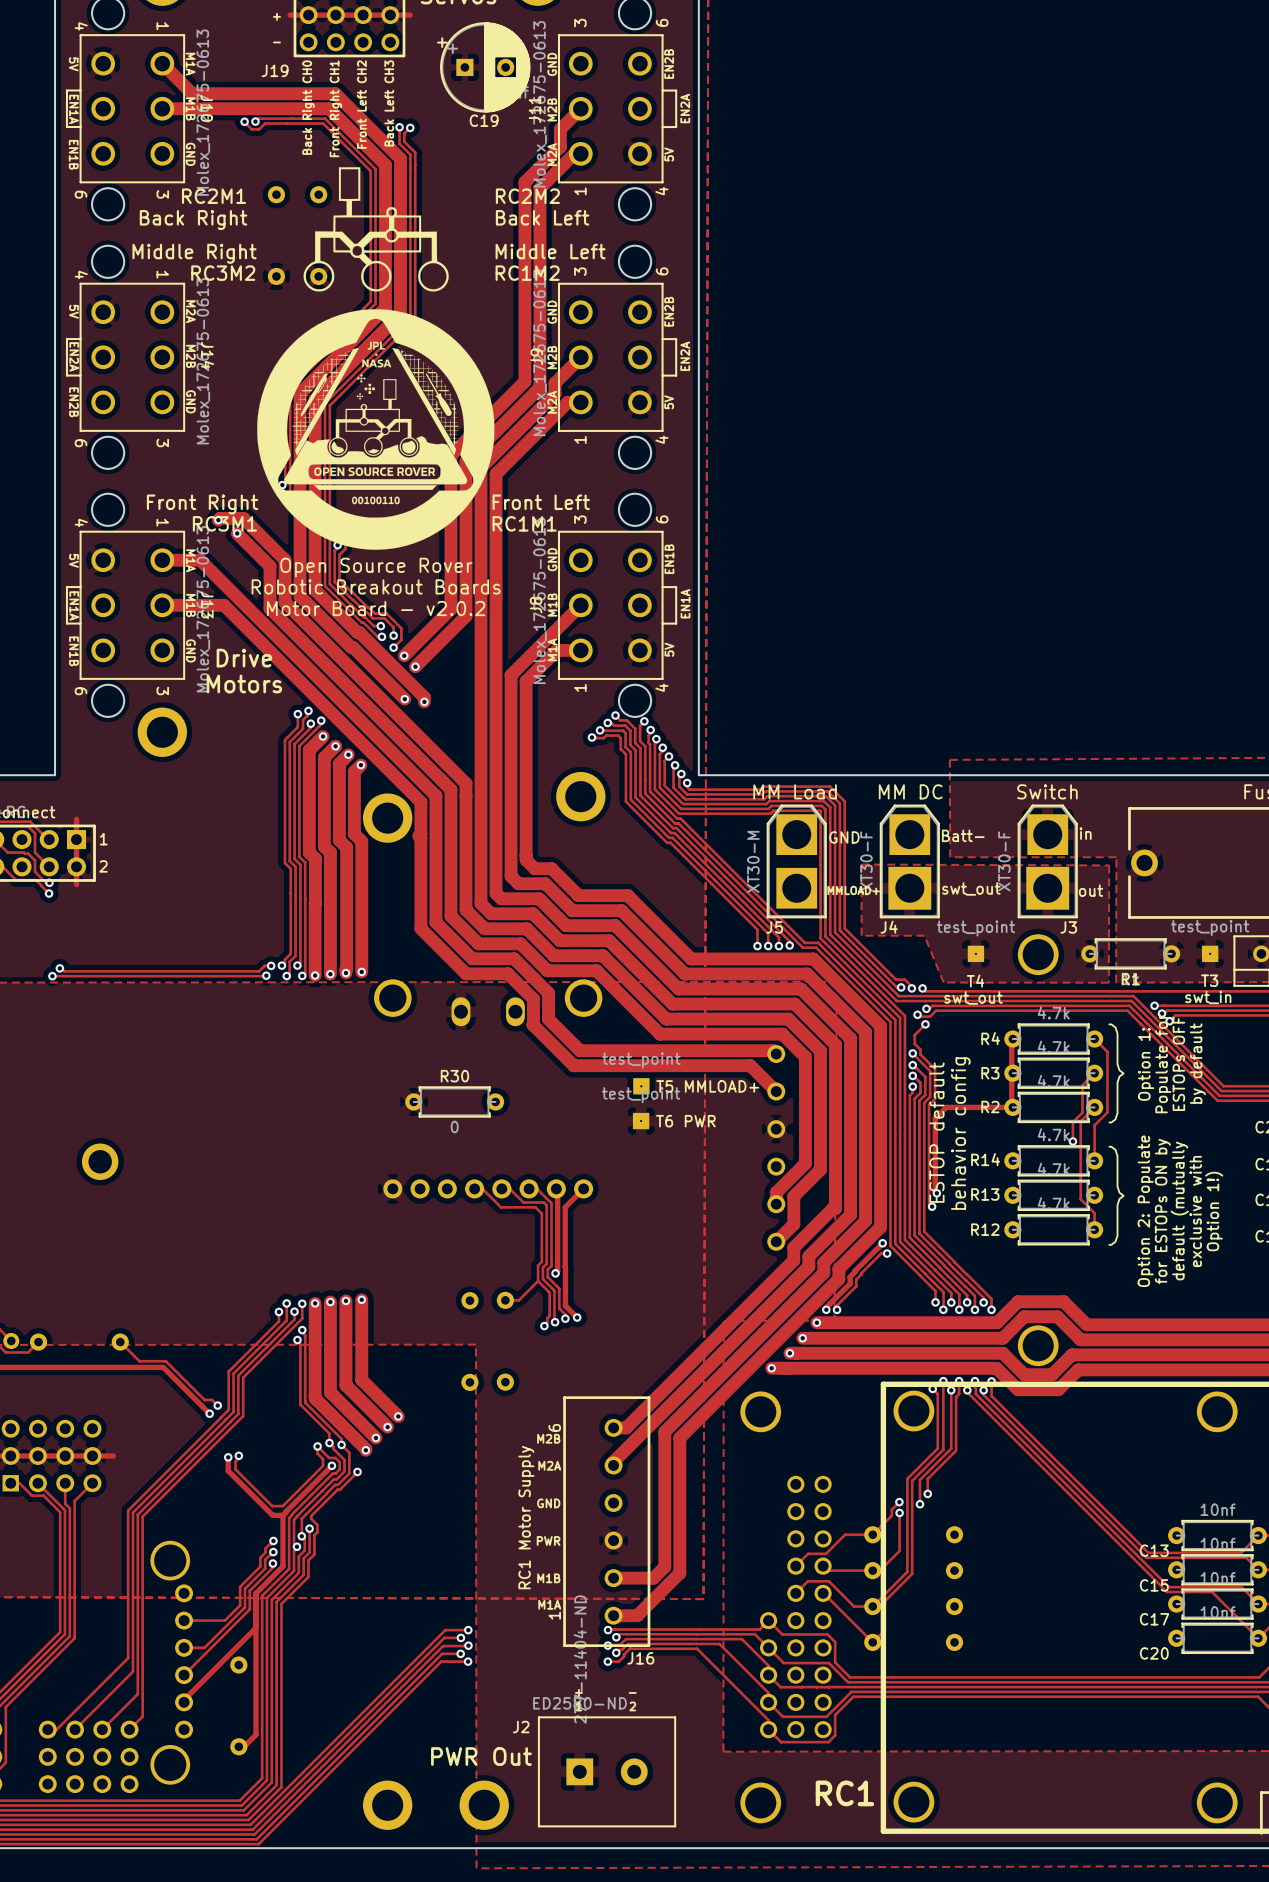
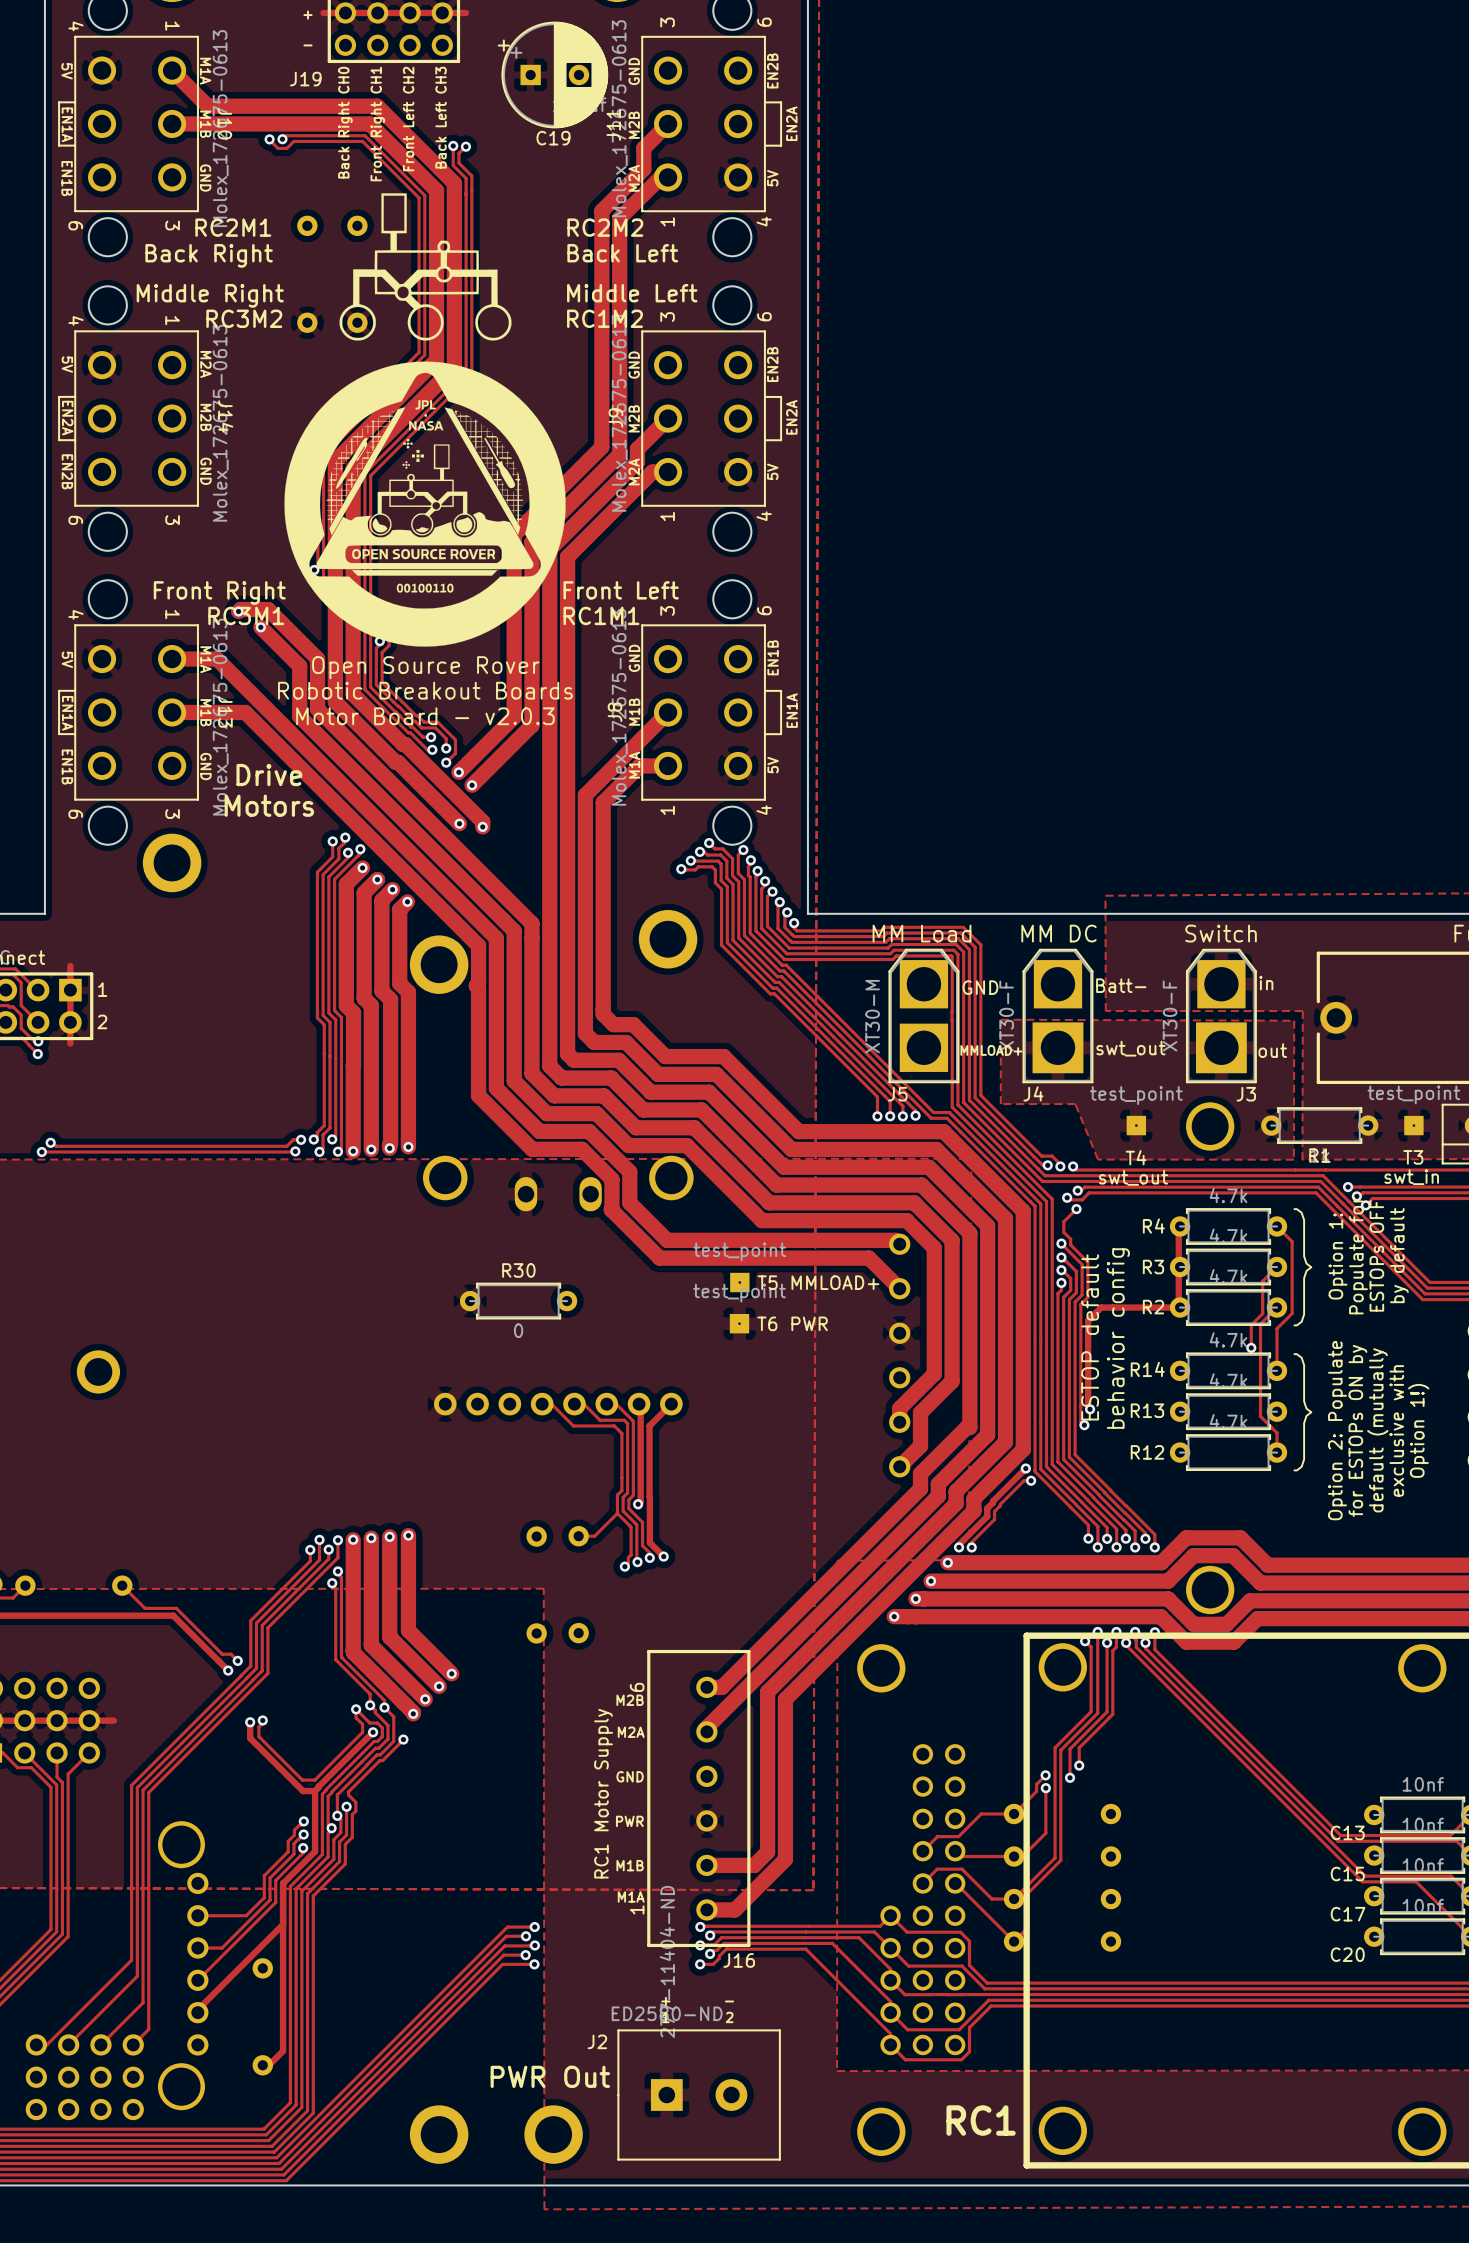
text: Motor Board - v2.0.2 (376, 608) -> Motor Board - v2.0.3 (425, 716)

